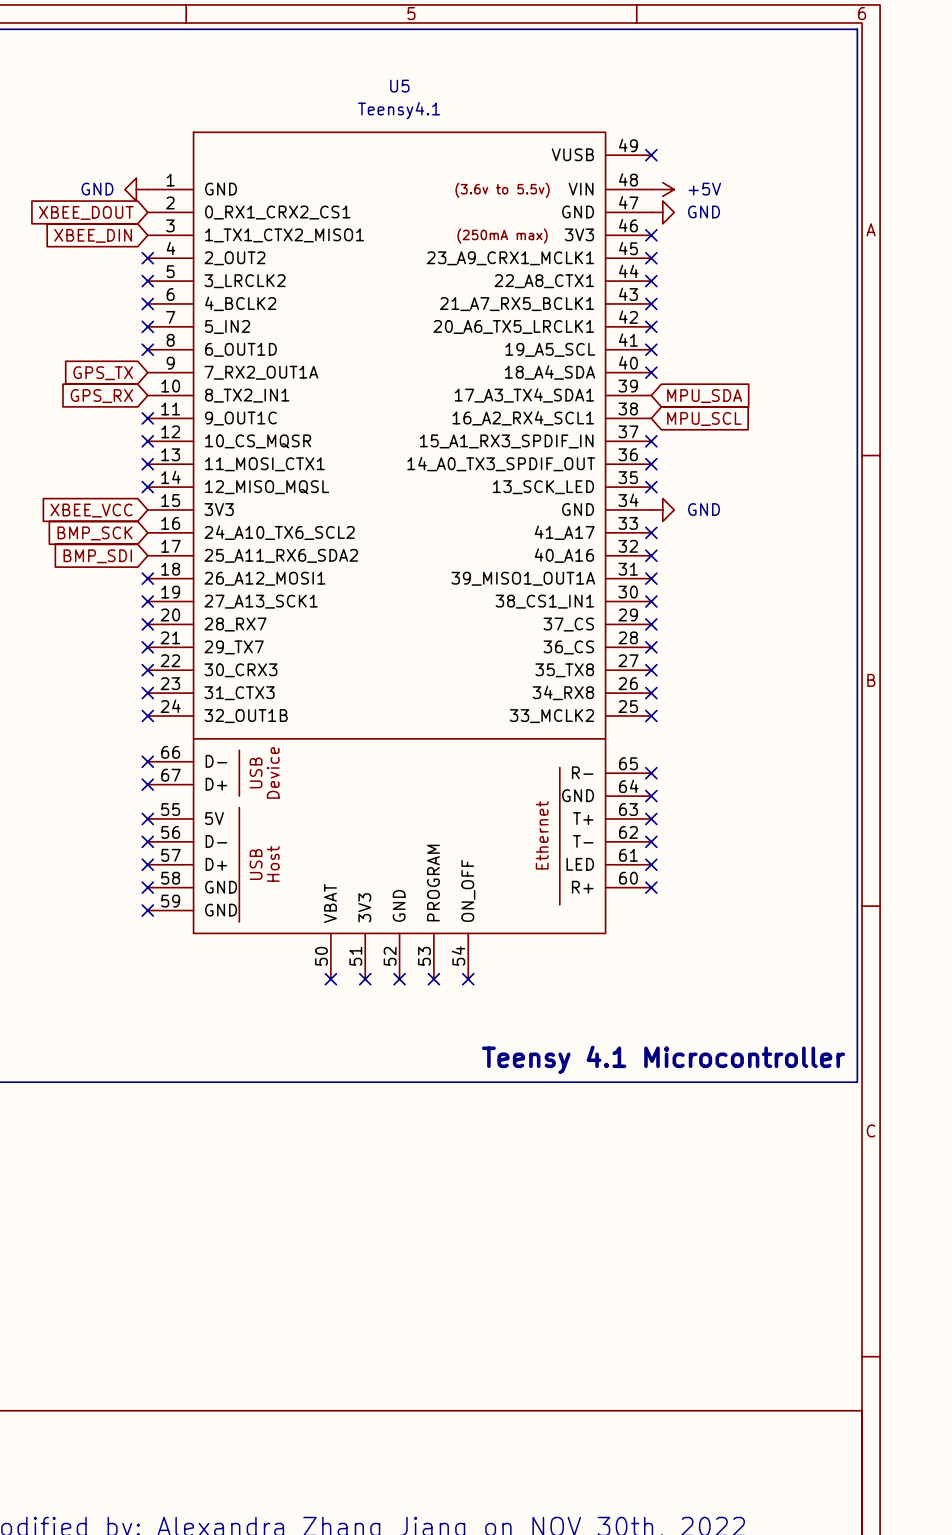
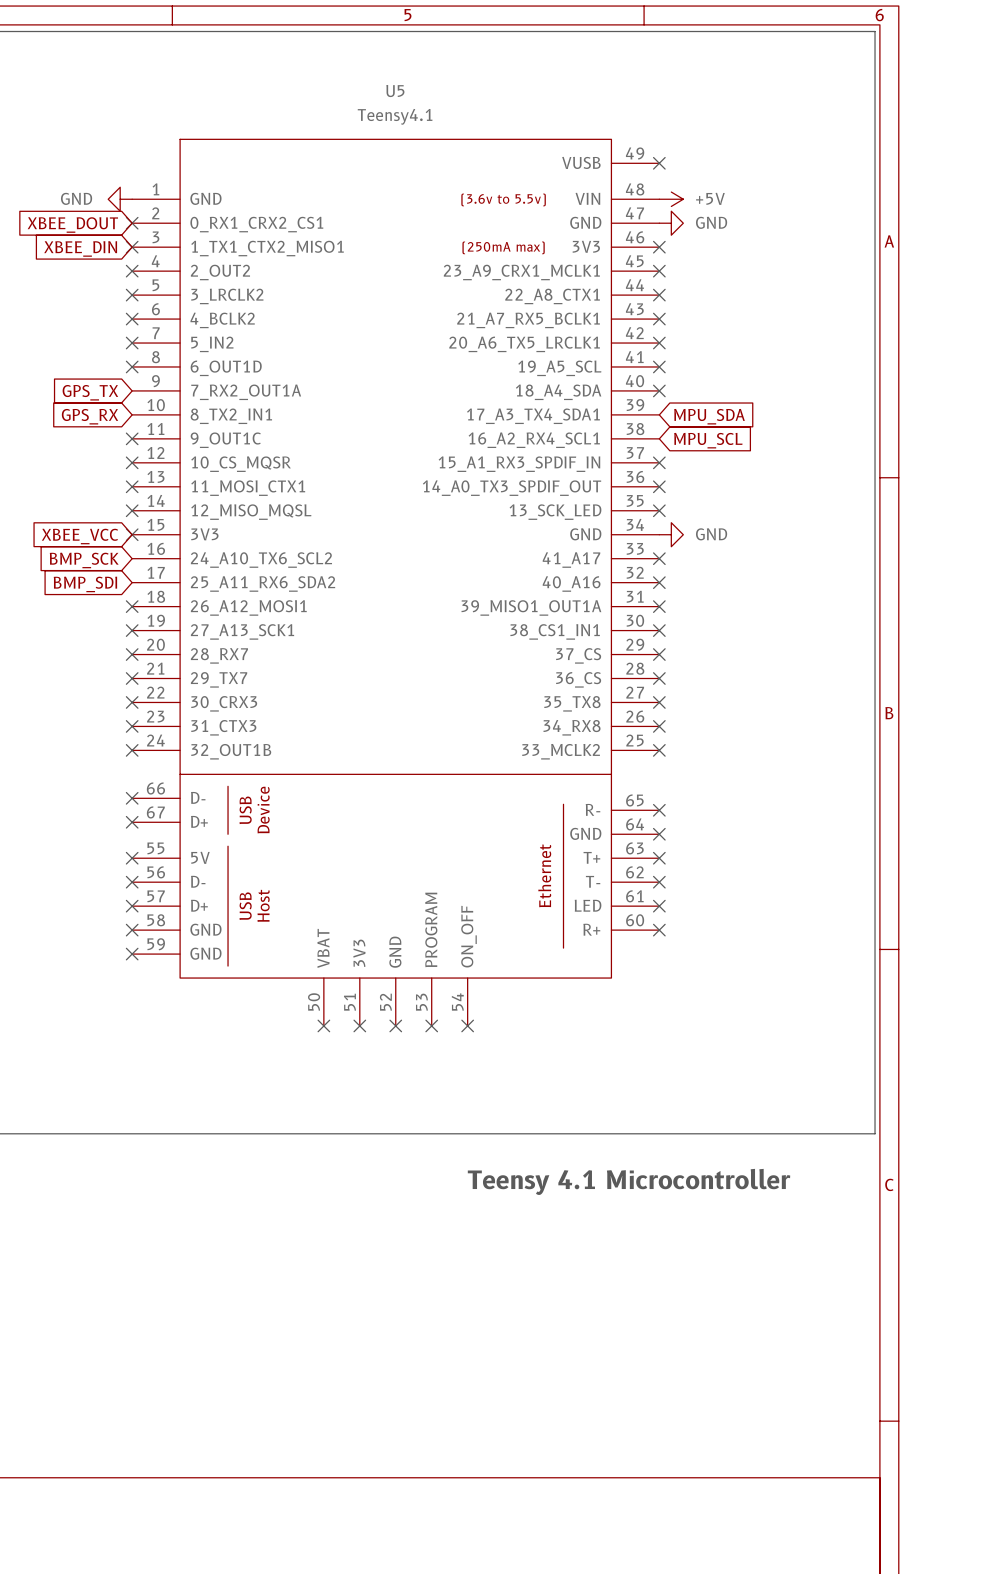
no-connect mark: none -> (132, 223)
no-connect mark: none -> (132, 247)
no-connect mark: none -> (132, 534)
text position: Teensy 4.1 Microcontroller (663, 1059) -> Teensy 4.1 Microcontroller (629, 1181)

